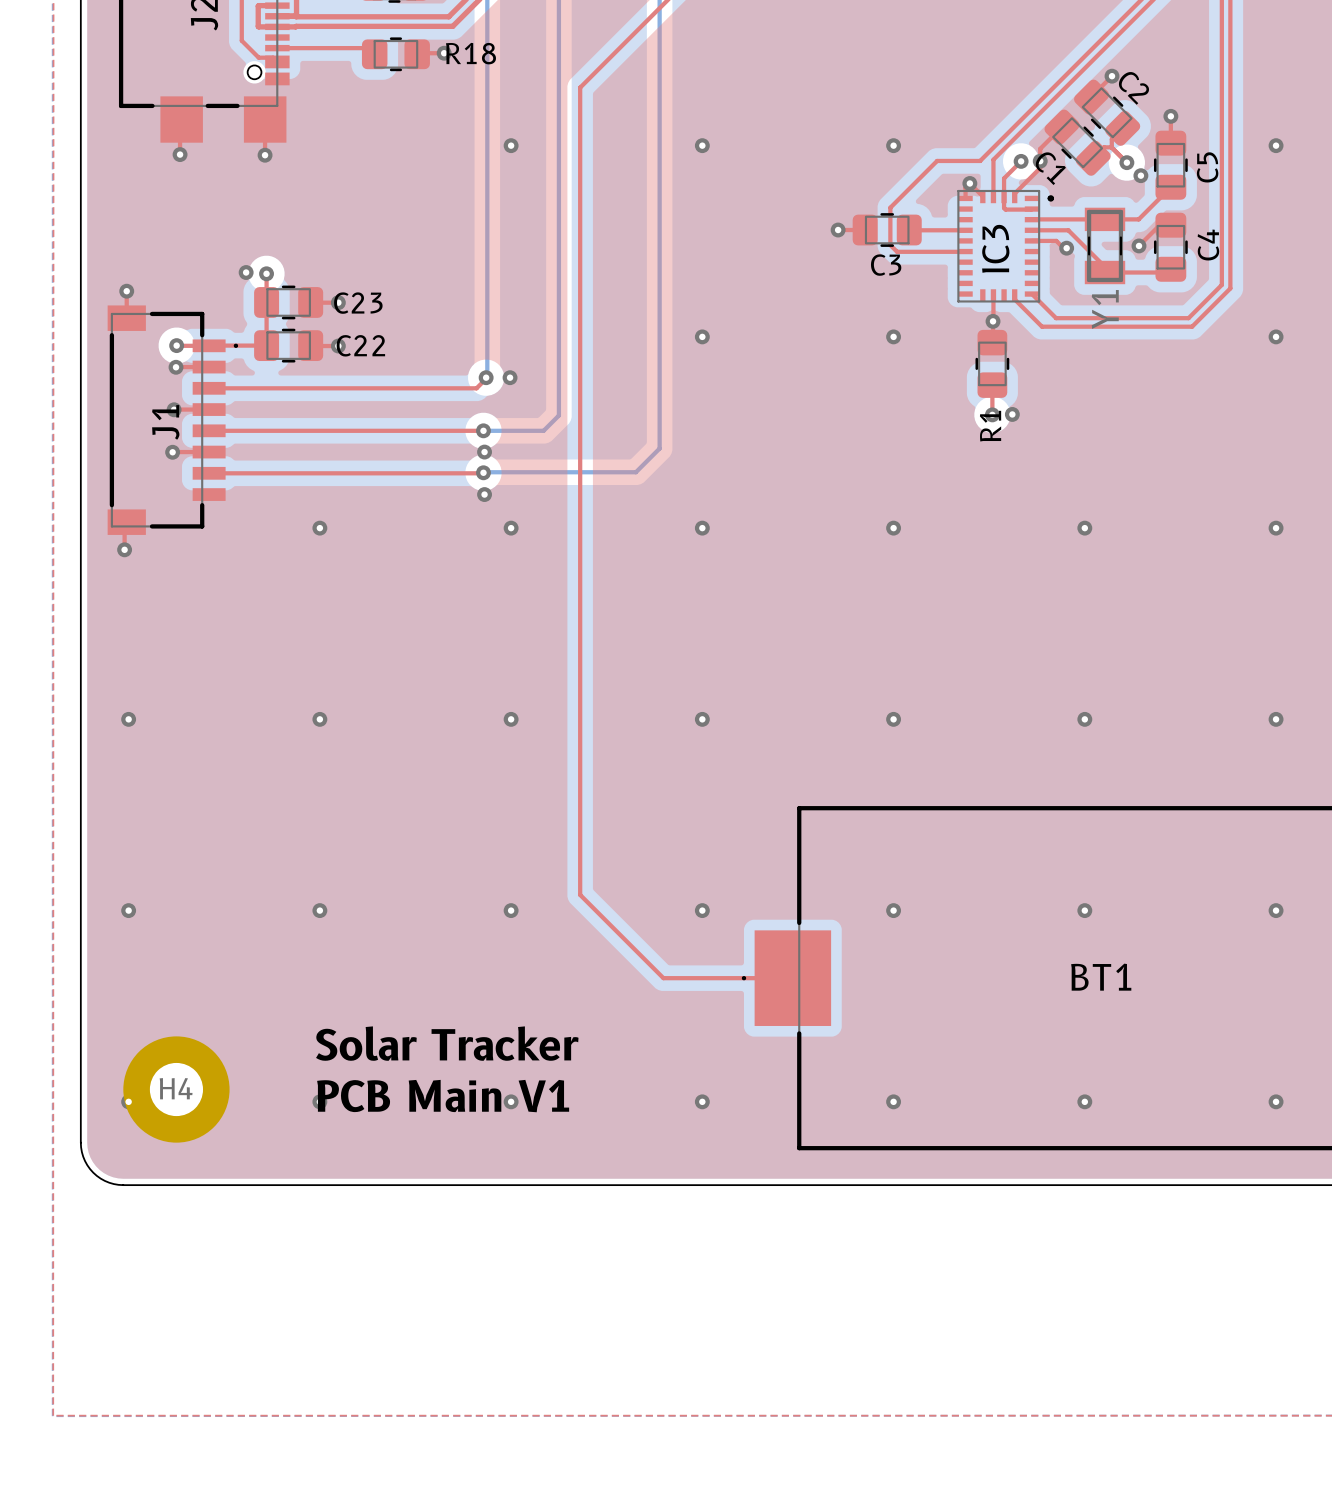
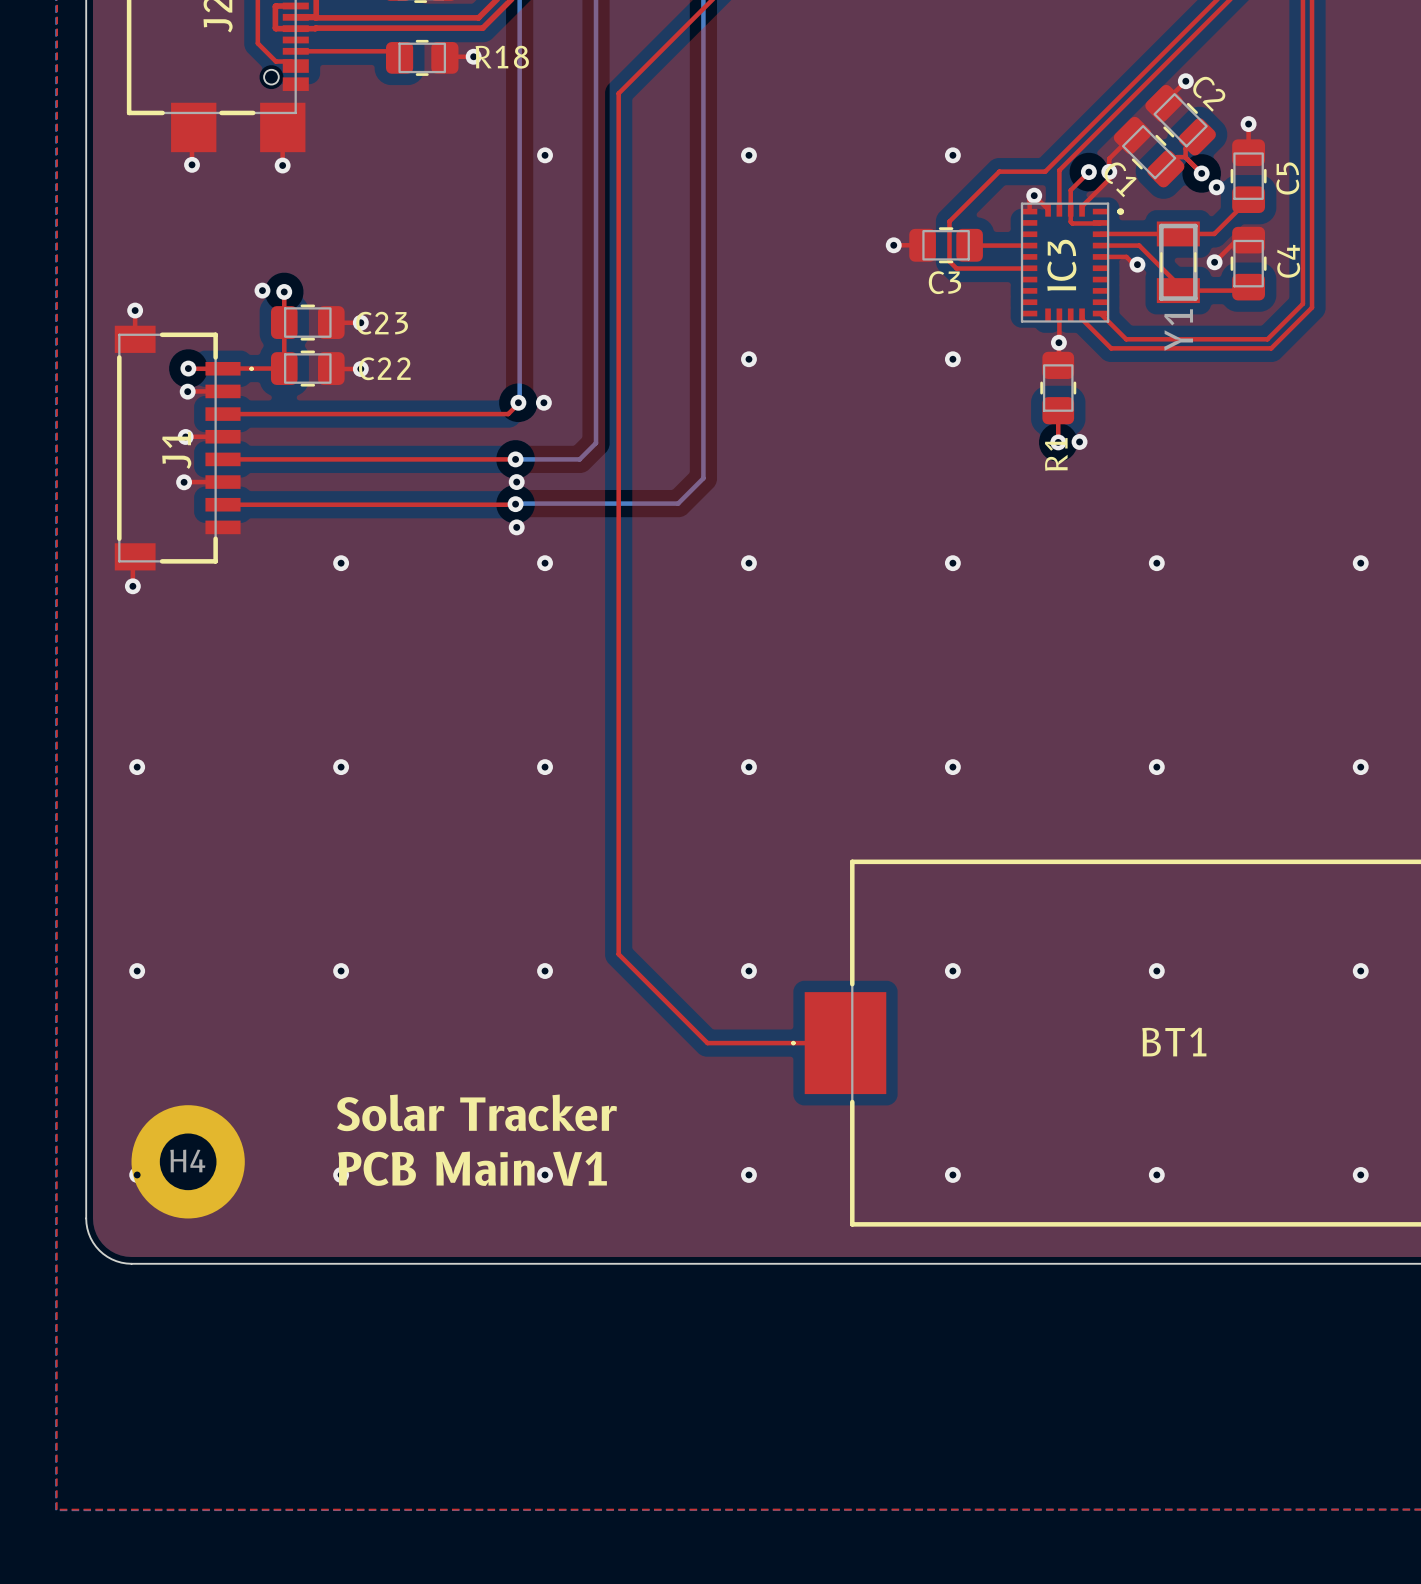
via: (1276, 145) -> none
via: (1276, 336) -> none

